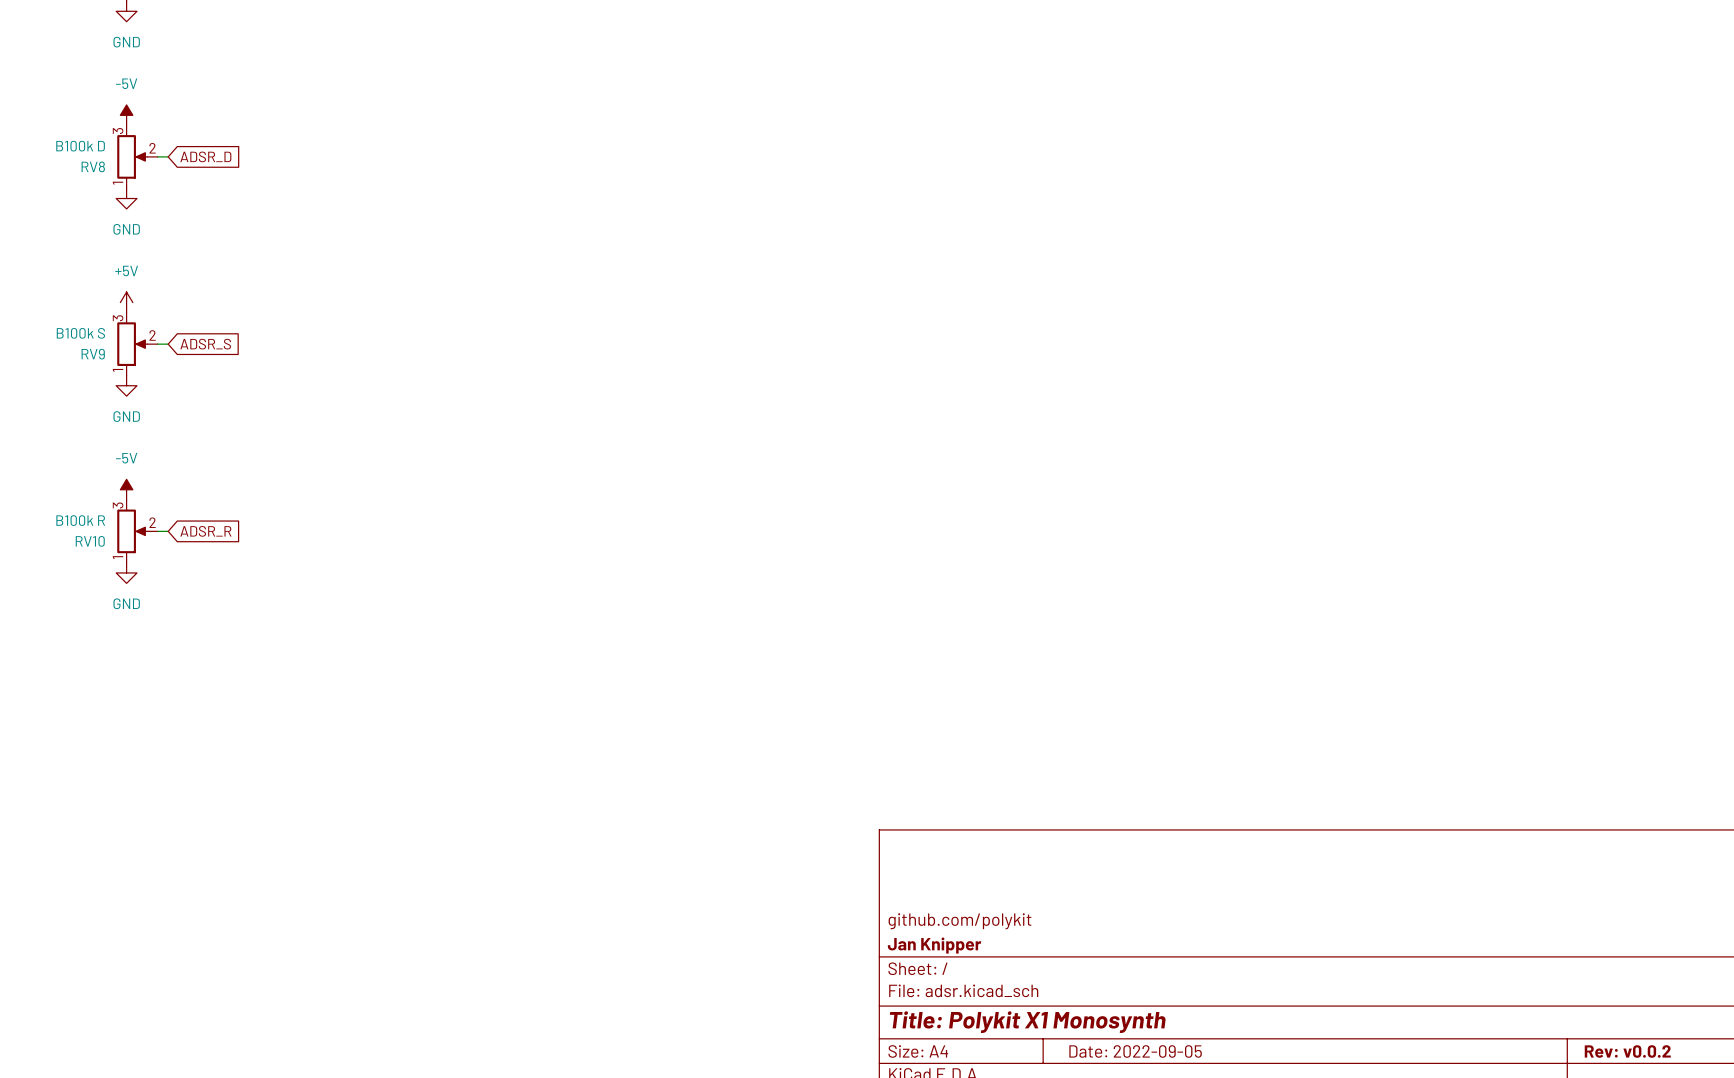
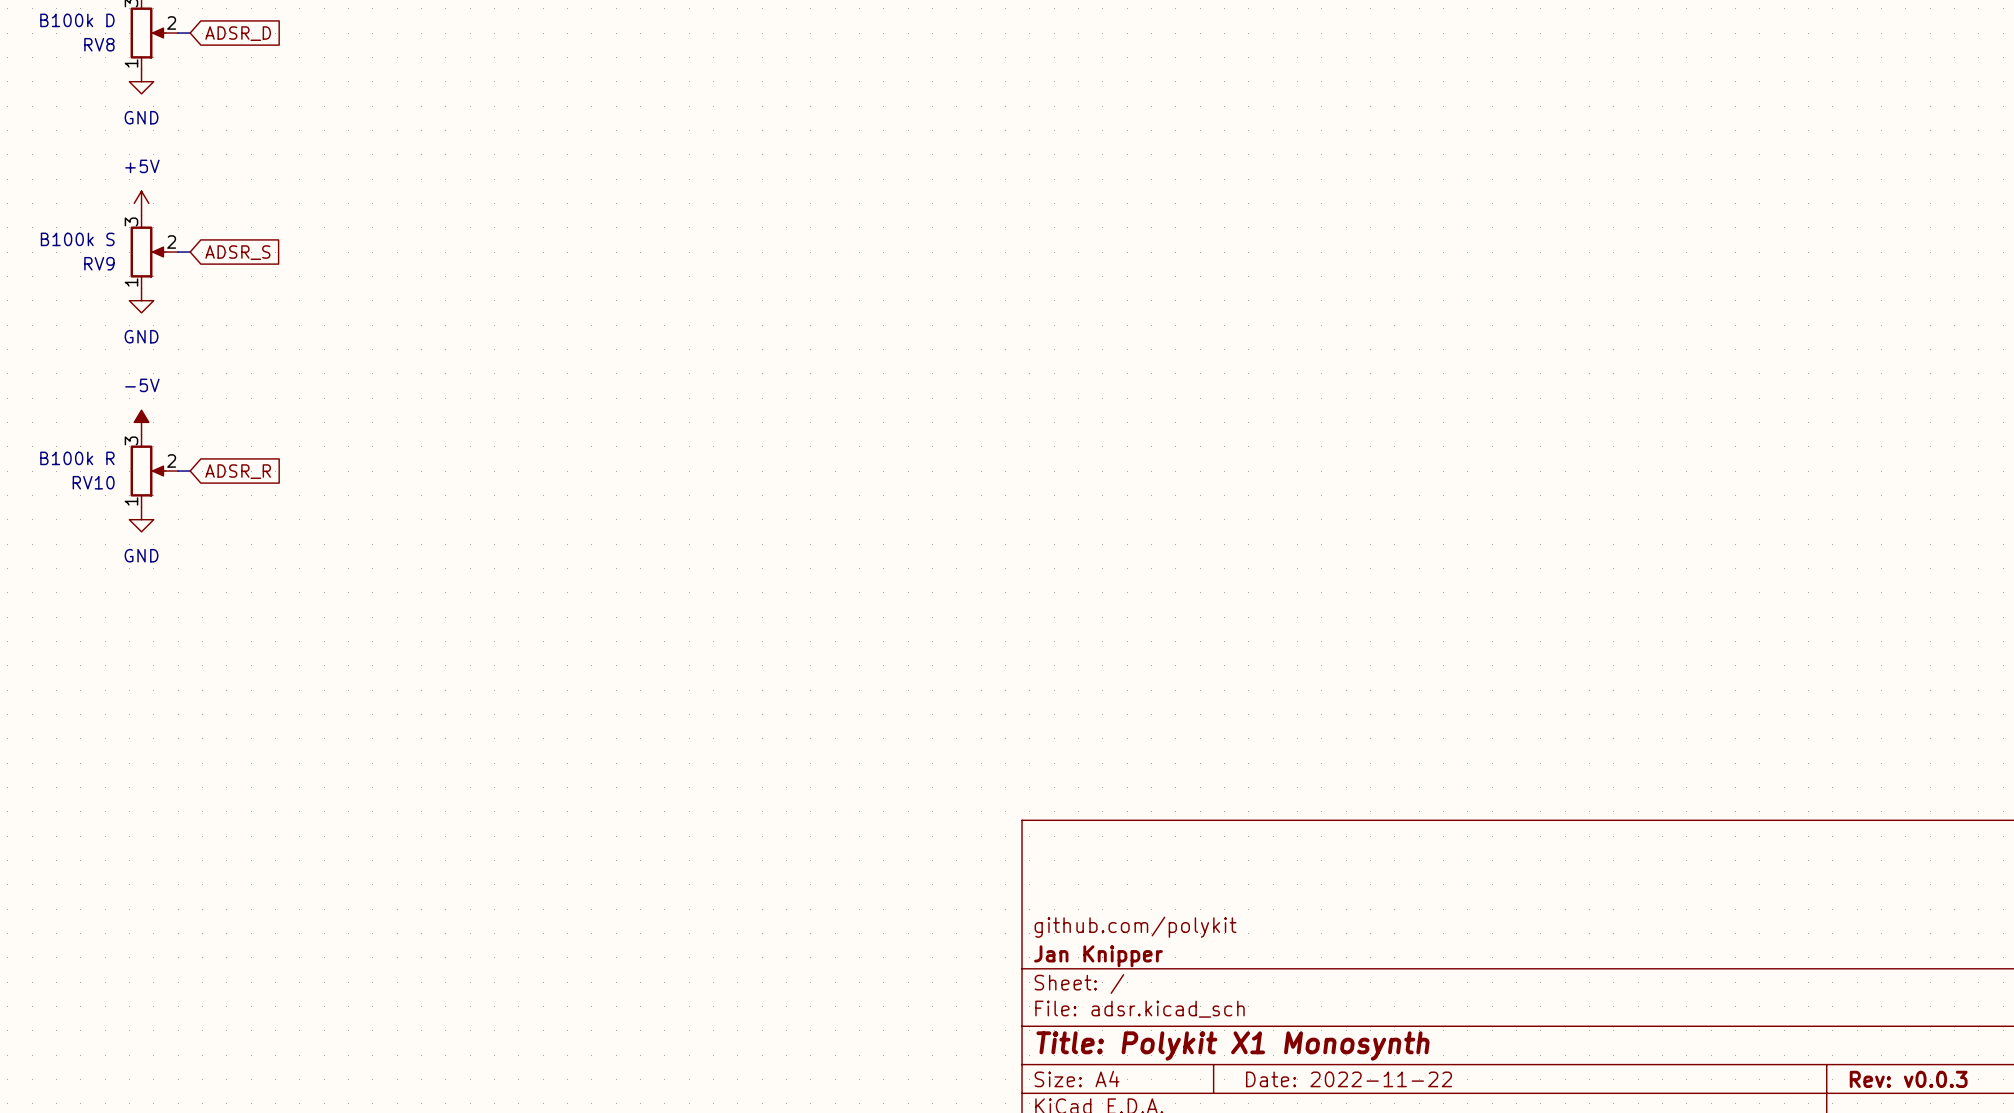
title block: Date: 2022-09-05 (1135, 1051) -> Date: 2022-11-22 (1349, 1079)
title block: Rev: v0.0.2 (1627, 1051) -> Rev: v0.0.3 (1908, 1079)

